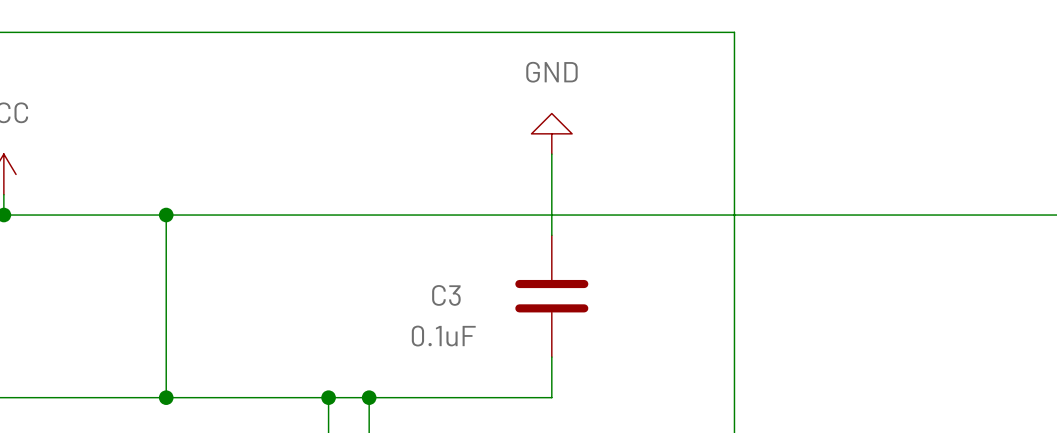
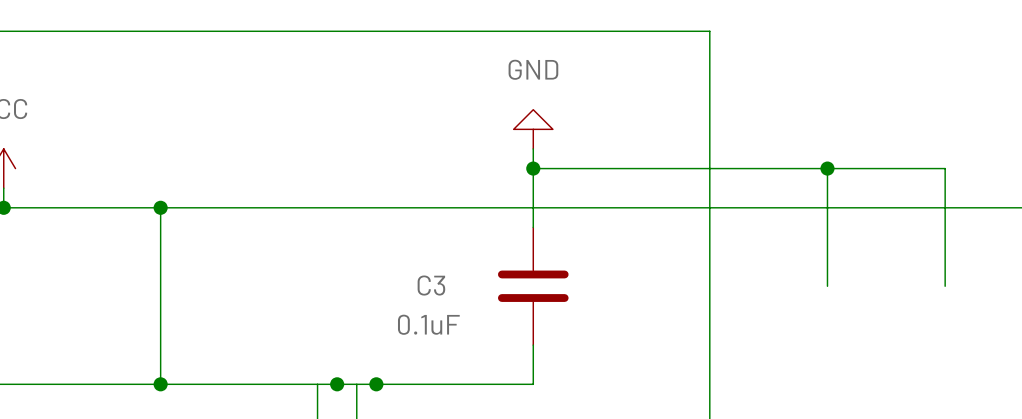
wire: none -> (533, 168) (945, 168) (945, 286)
junction: none -> (533, 168)
wire: none -> (827, 168) (827, 286)
junction: none -> (827, 168)
junction: (328, 397) -> none
junction: none -> (337, 384)
junction: (369, 397) -> none
junction: none -> (376, 384)

